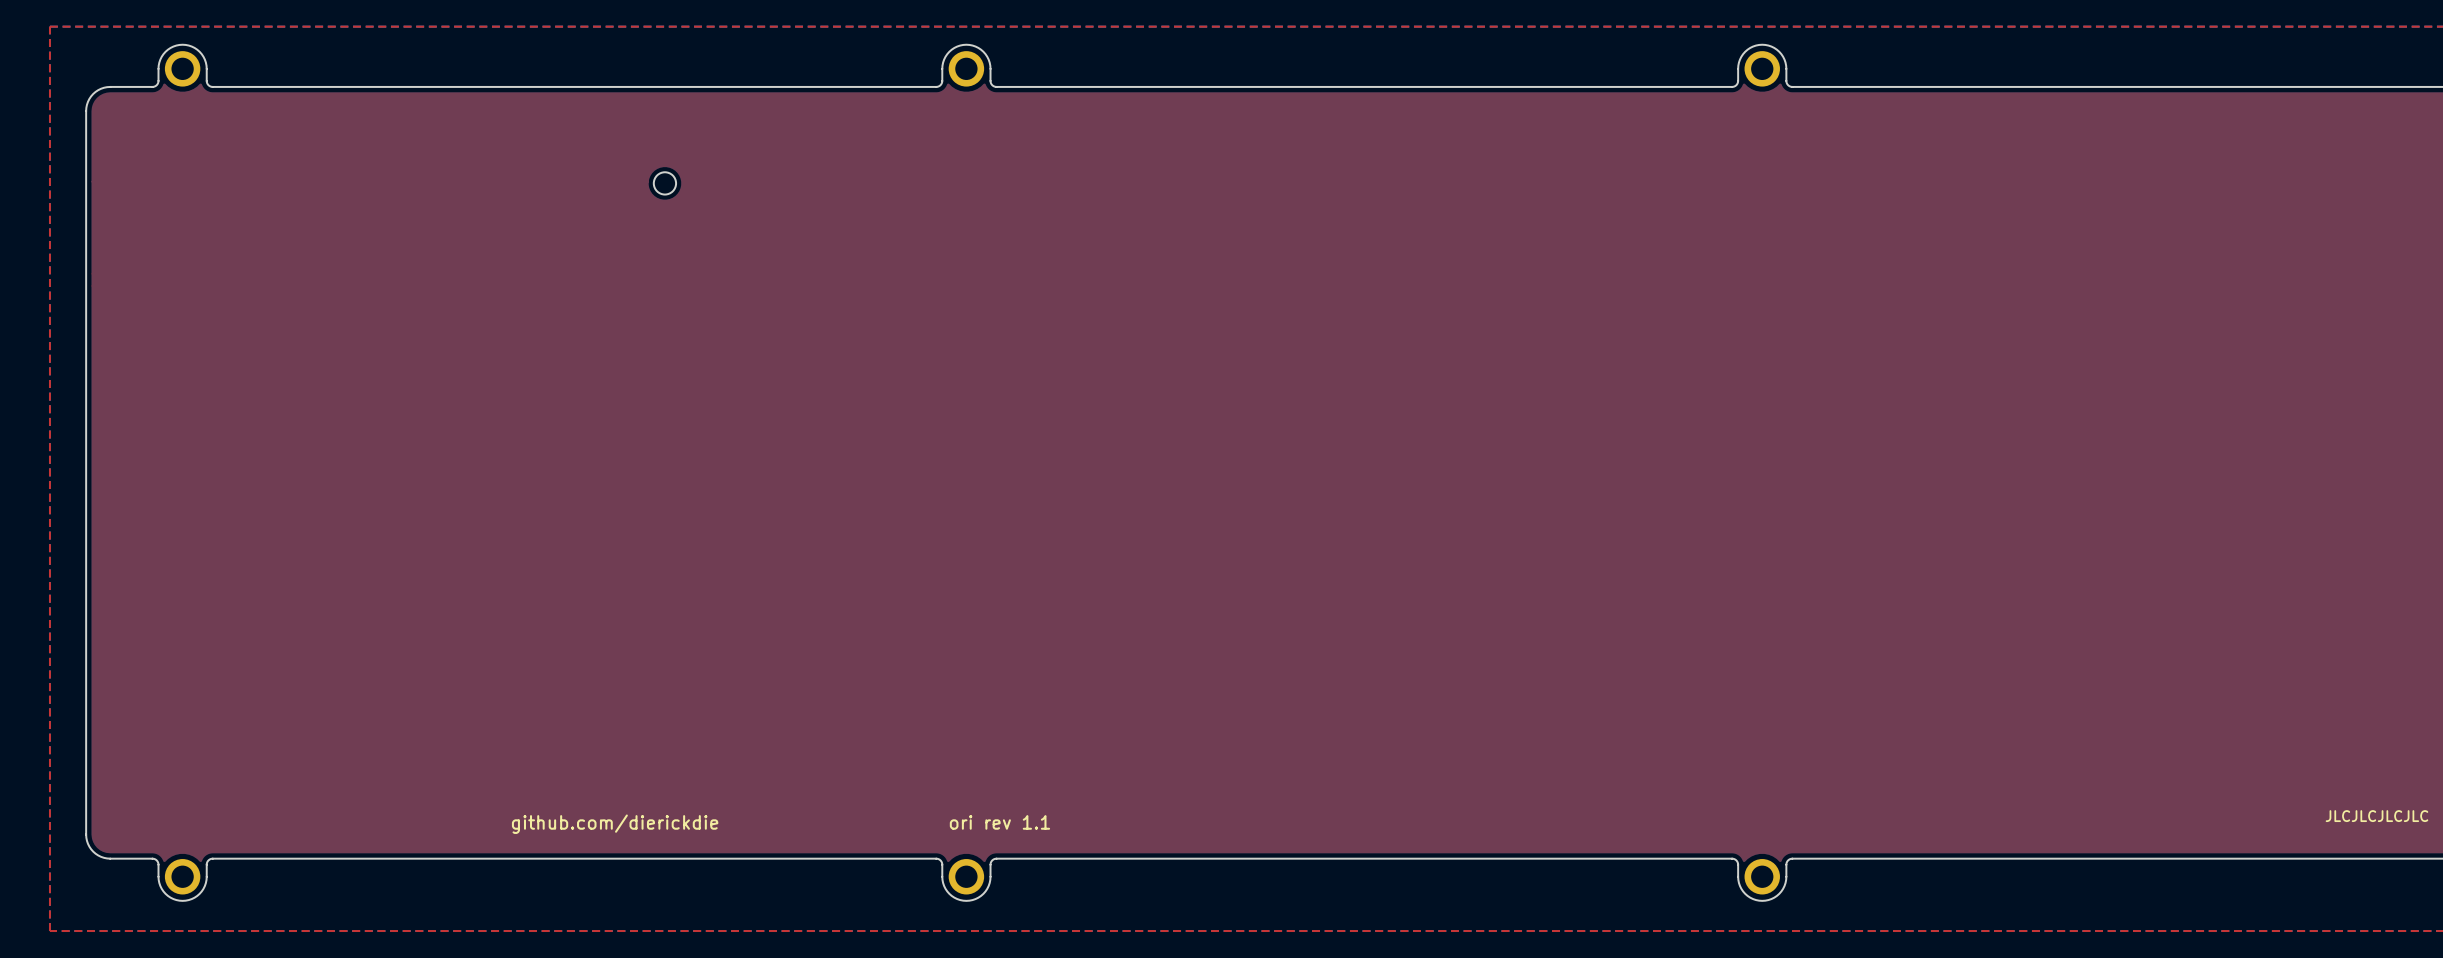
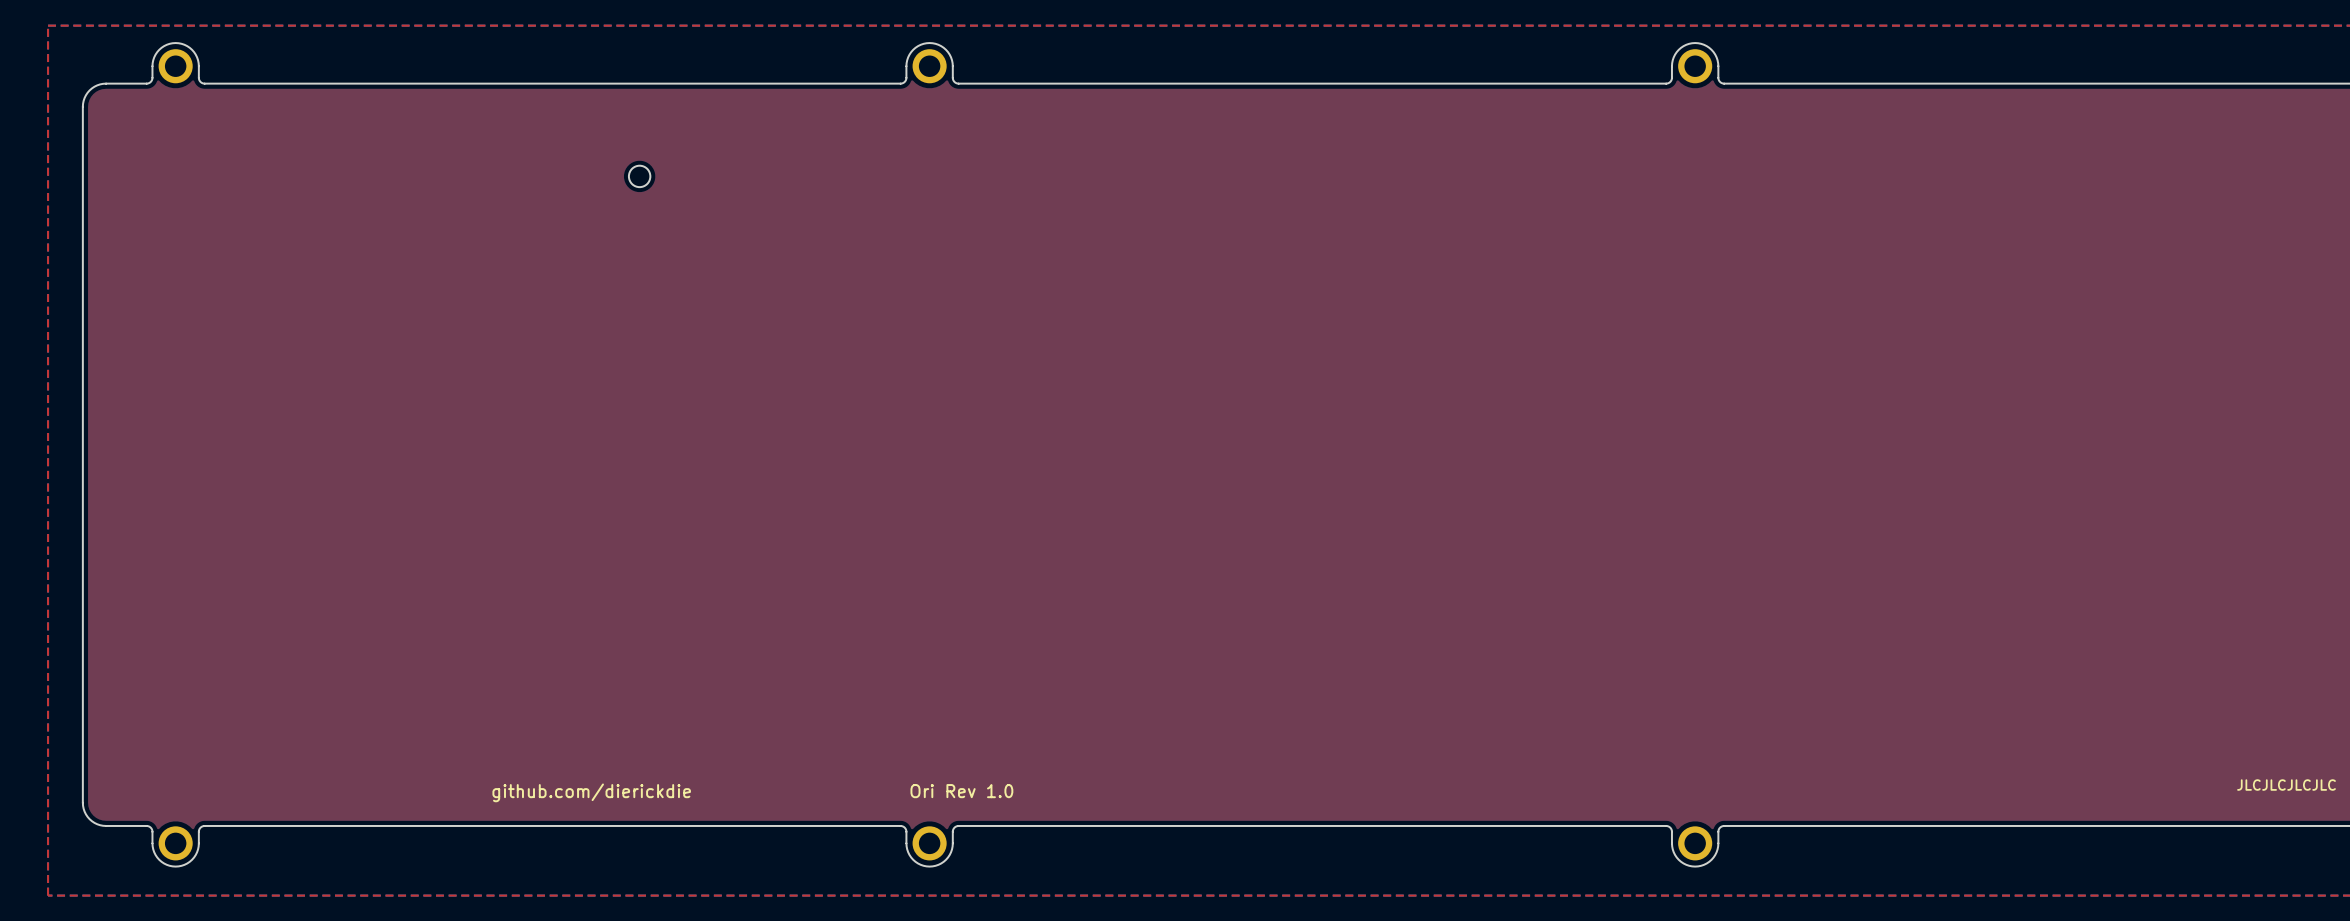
text: ori rev 1.1 (999, 822) -> Ori Rev 1.0 (961, 791)

